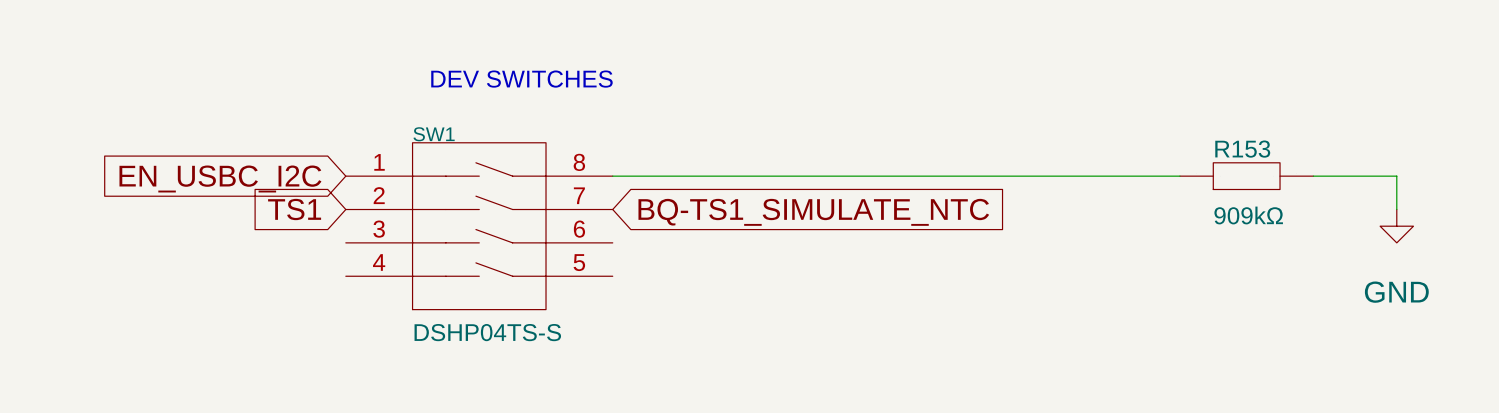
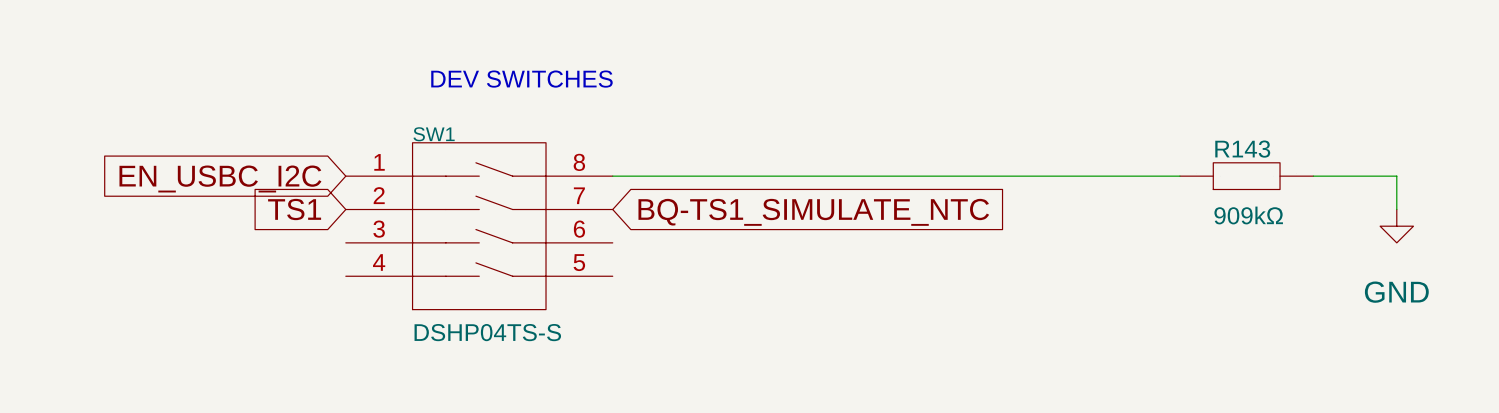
R153 name: R153 (1242, 149) -> R143 (1242, 149)

